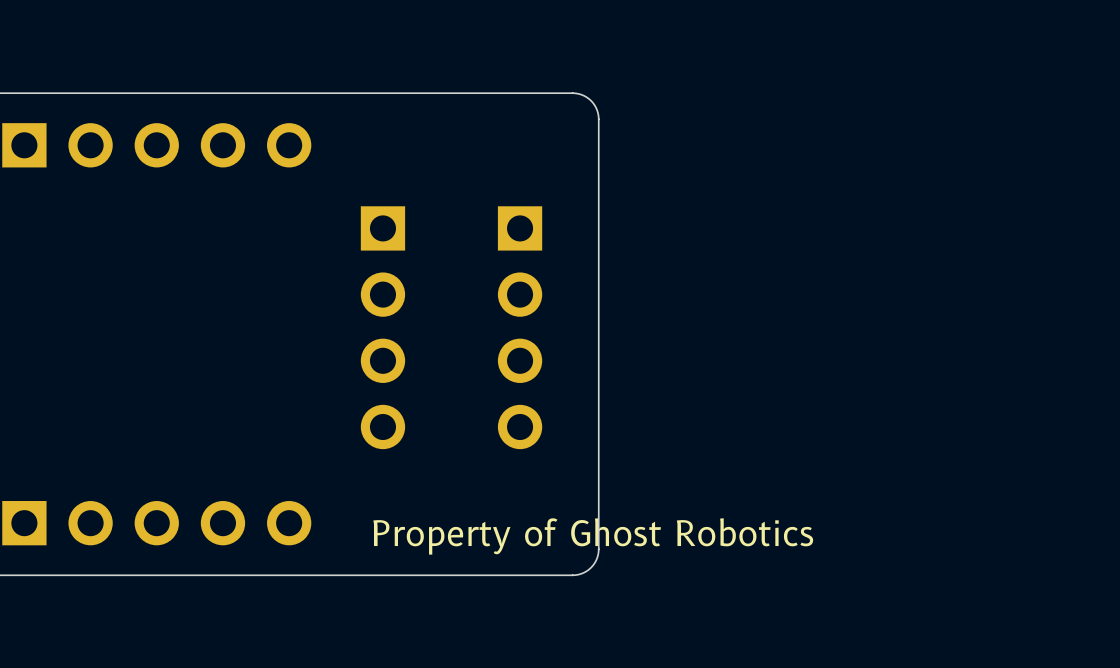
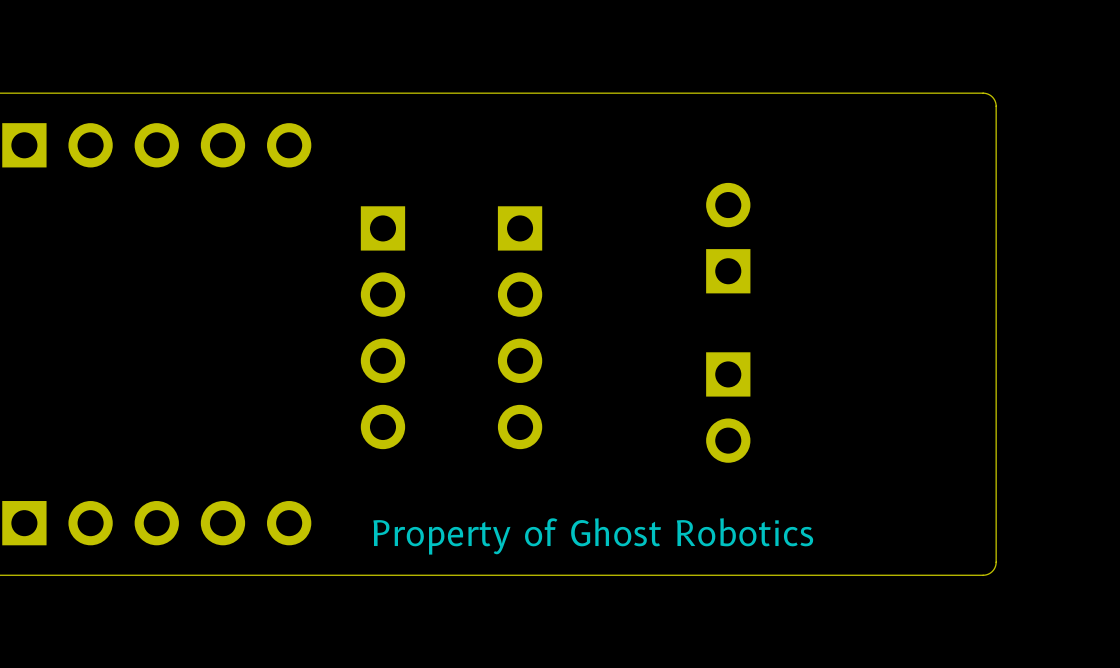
board edge: (572, 93) (583, 95) (591, 100) (597, 110) (598, 119) (598, 552) (594, 563) (588, 569) (572, 575) -> (572, 93) (983, 93) (992, 96) (996, 106) (996, 562) (992, 571) (983, 575) (572, 575)
part: none -> (728, 238)
part: none -> (728, 407)

